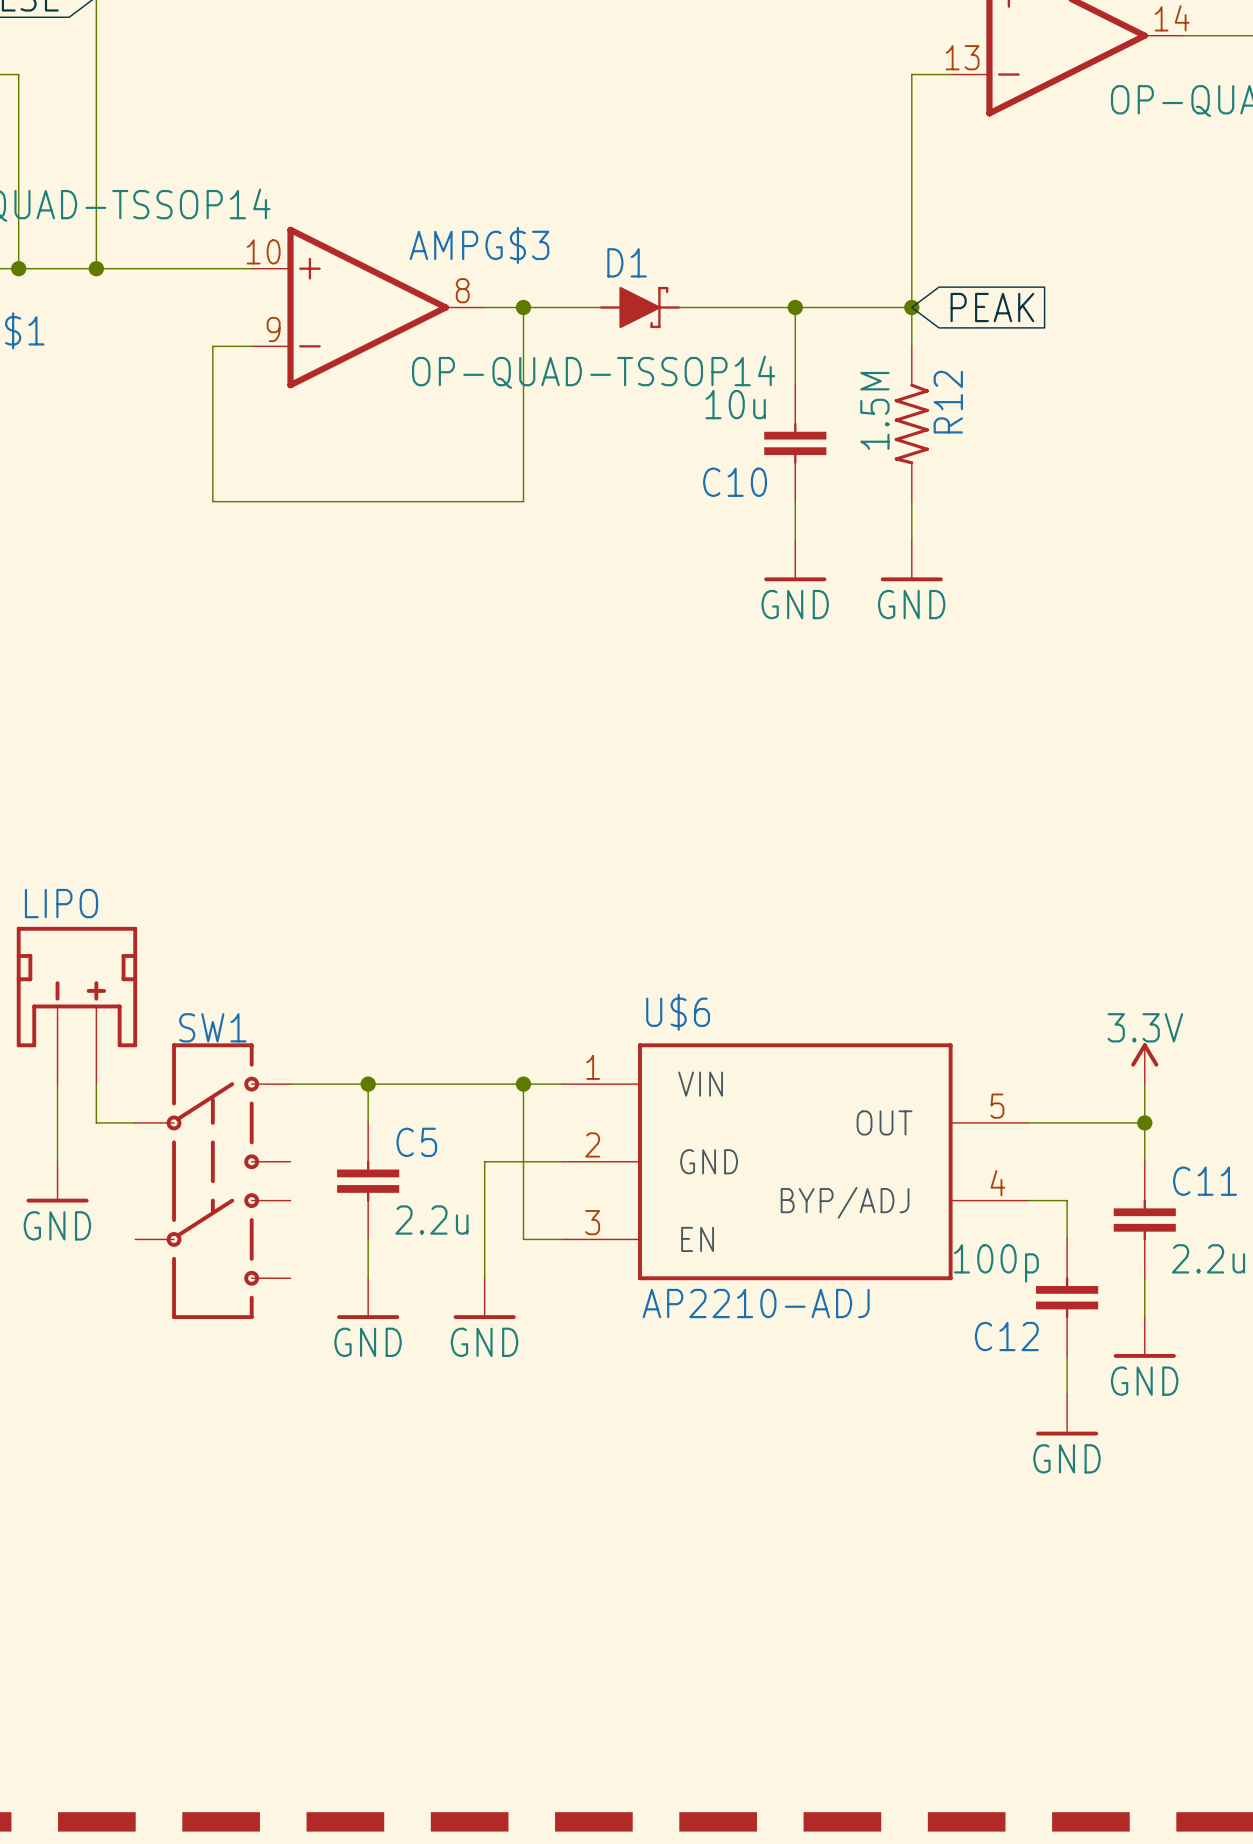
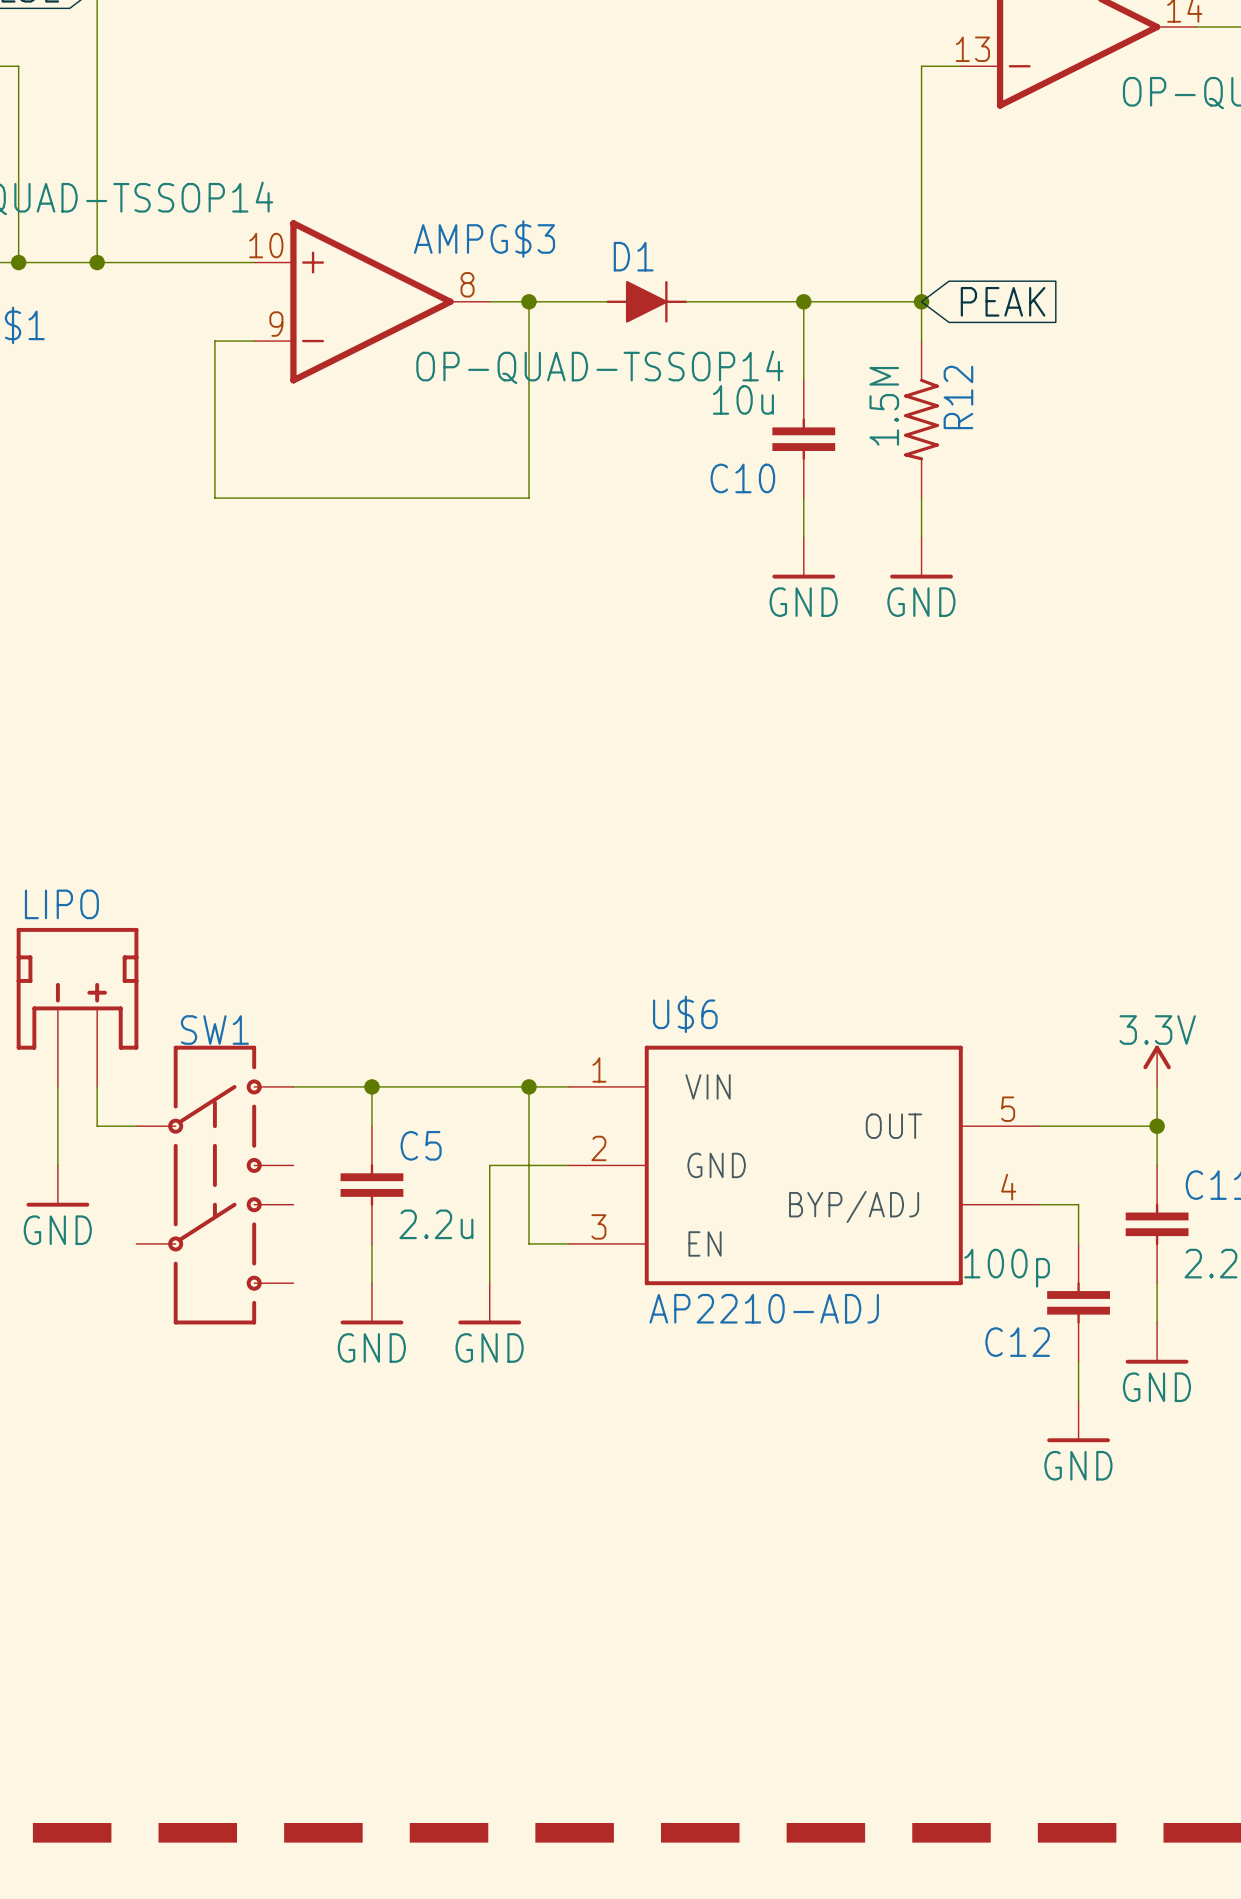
D1 symbol: [599, 286, 680, 329] -> [606, 280, 688, 323]

